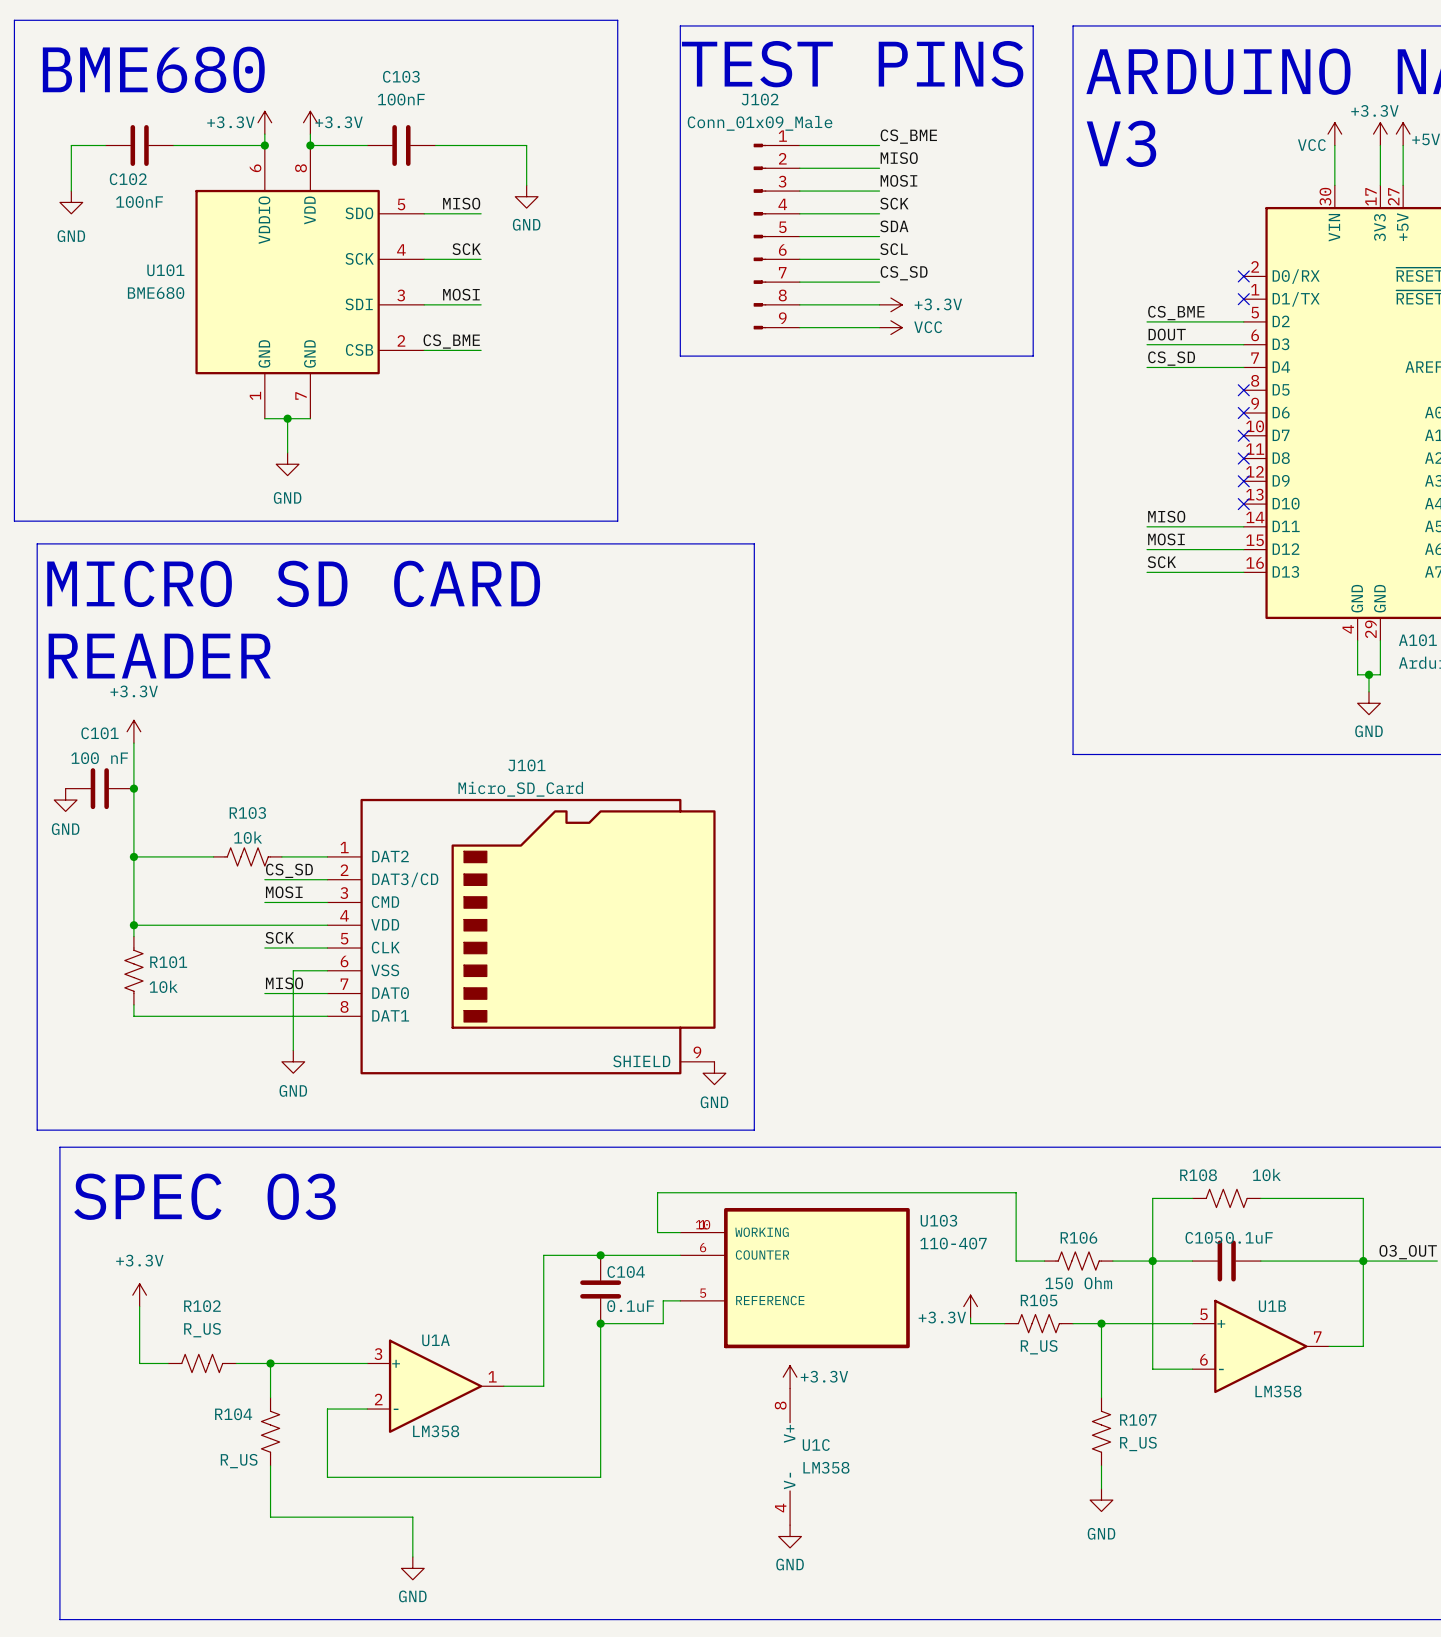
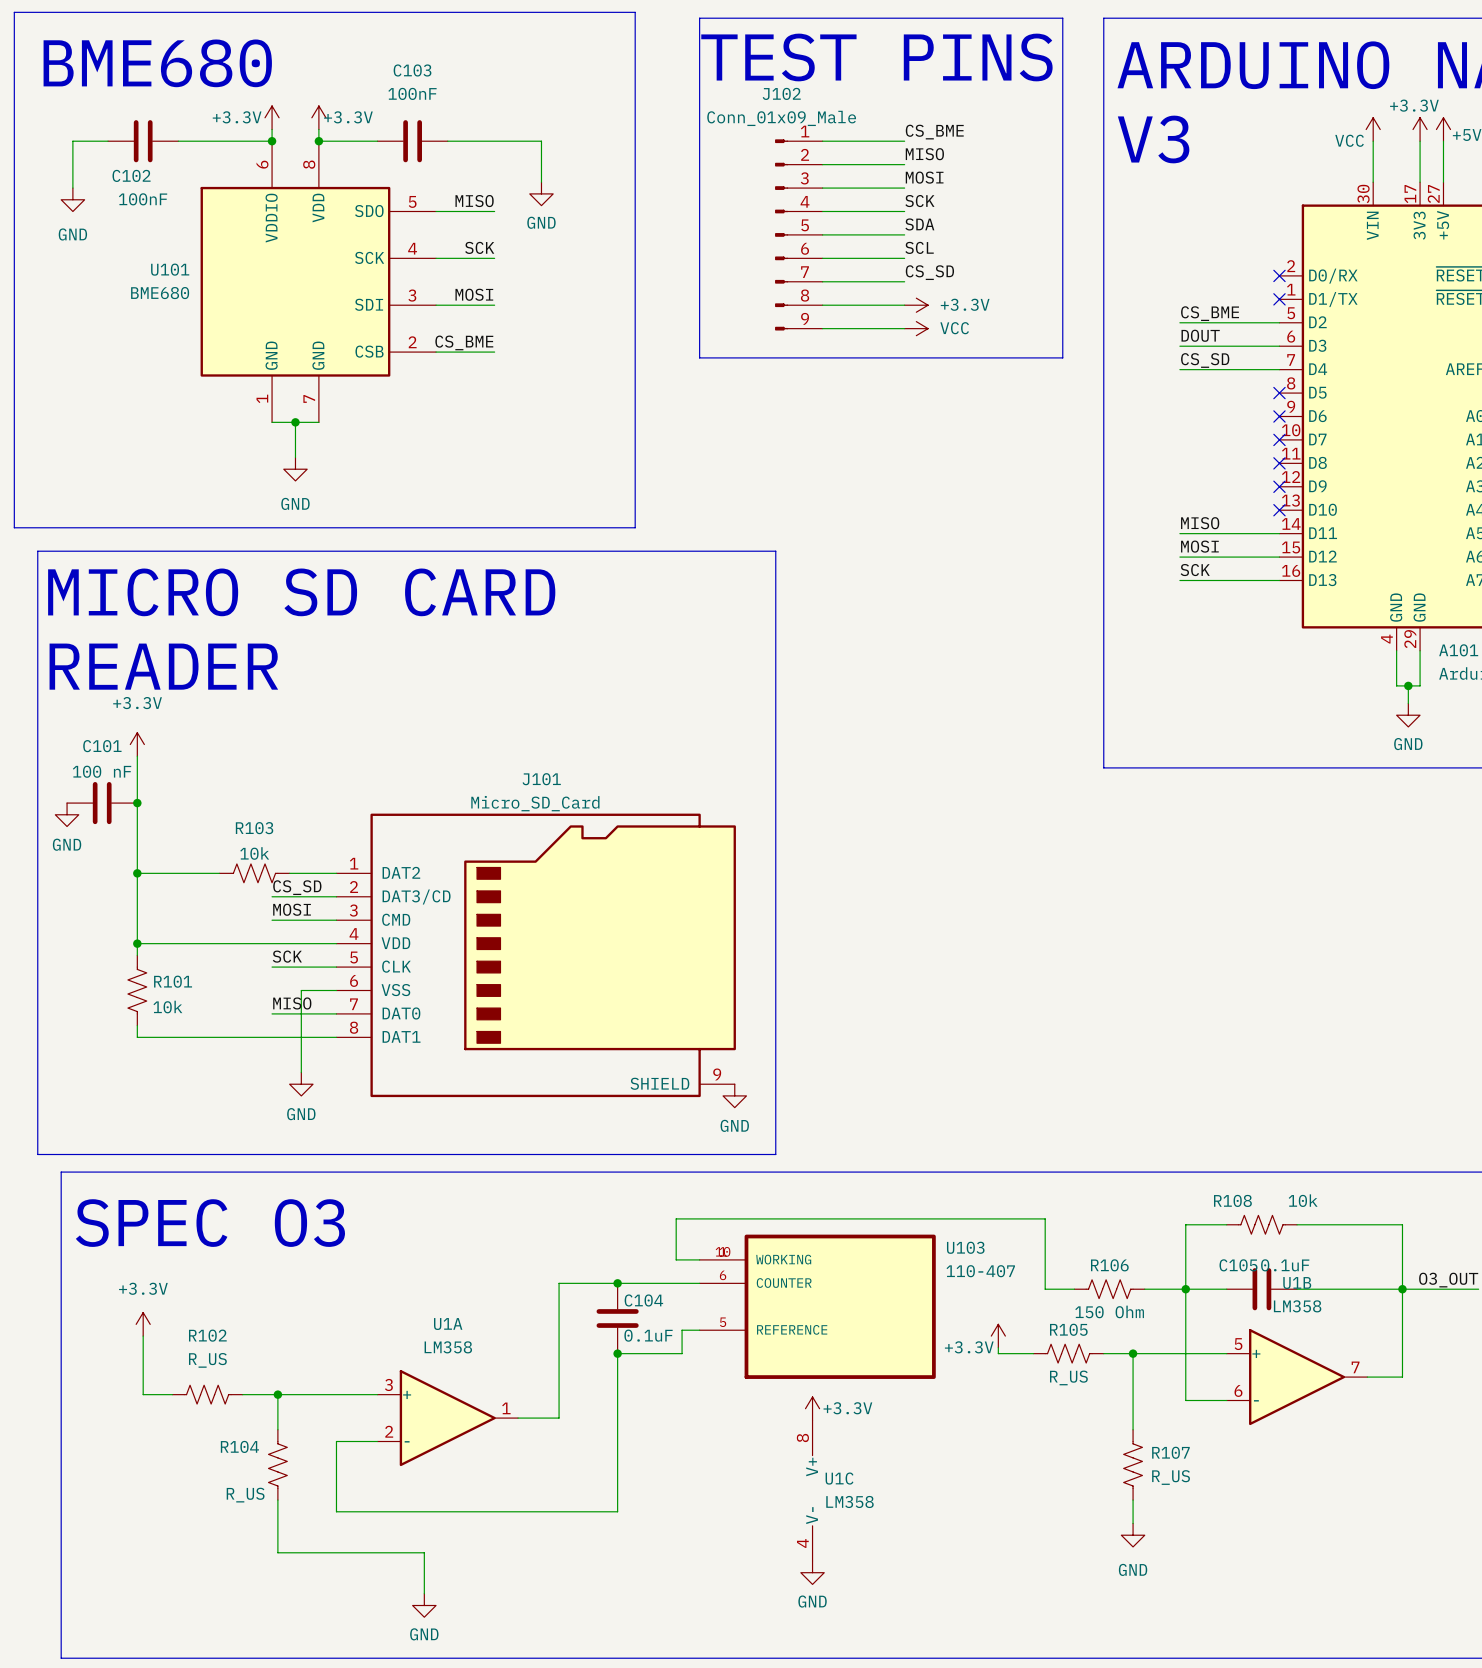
U1B name position: U1B (1272, 1306) -> U1B (1297, 1283)
U1A name position: U1A (436, 1340) -> U1A (448, 1324)
U1B value position: LM358 (1278, 1391) -> LM358 (1297, 1306)
U1A value position: LM358 (436, 1431) -> LM358 (448, 1347)

